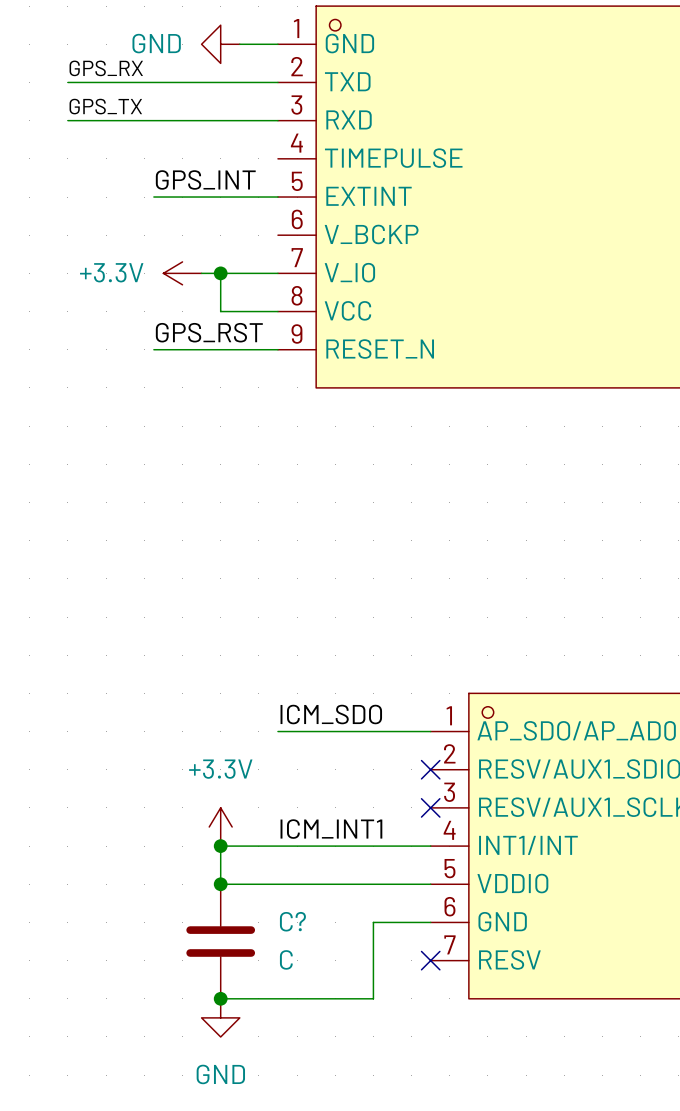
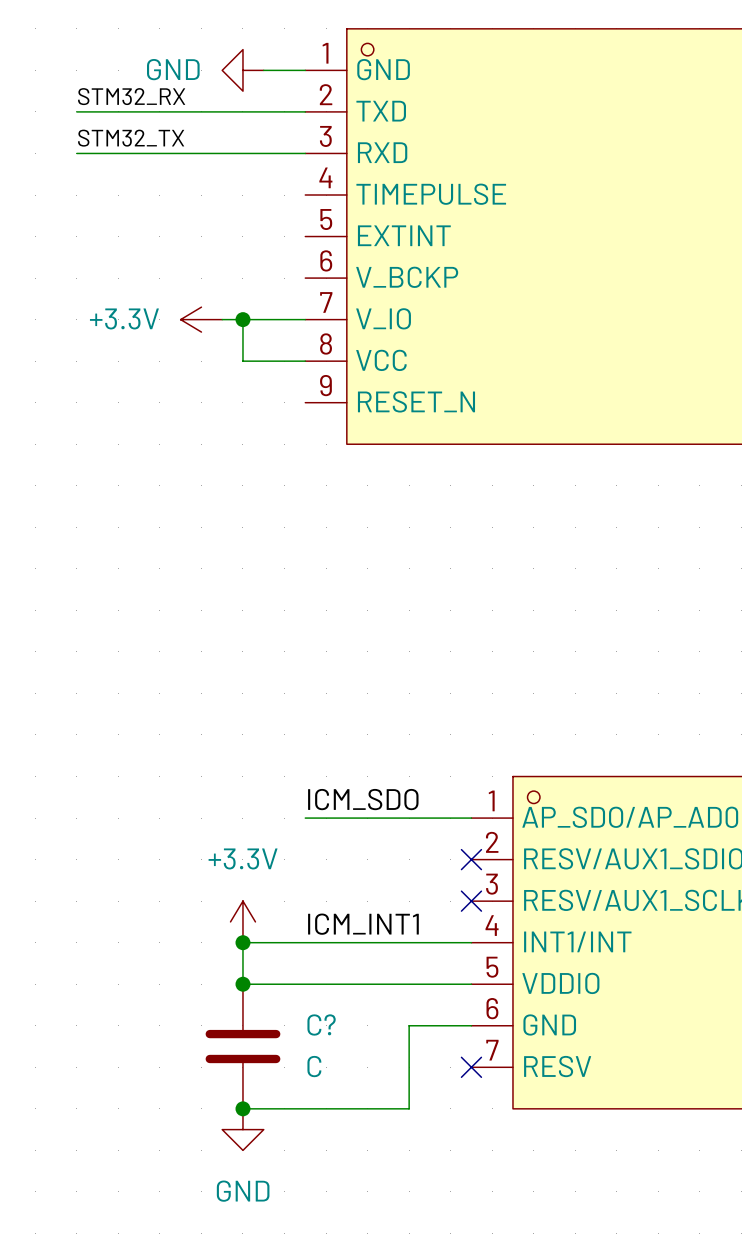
label: GPS_RX (106, 68) -> STM32_RX (131, 96)
label: GPS_TX (105, 106) -> STM32_TX (131, 138)
label: GPS_INT (205, 179) -> none
wire: (153, 197) (277, 197) -> none
label: GPS_RST (209, 332) -> none
wire: (153, 349) (277, 349) -> none

